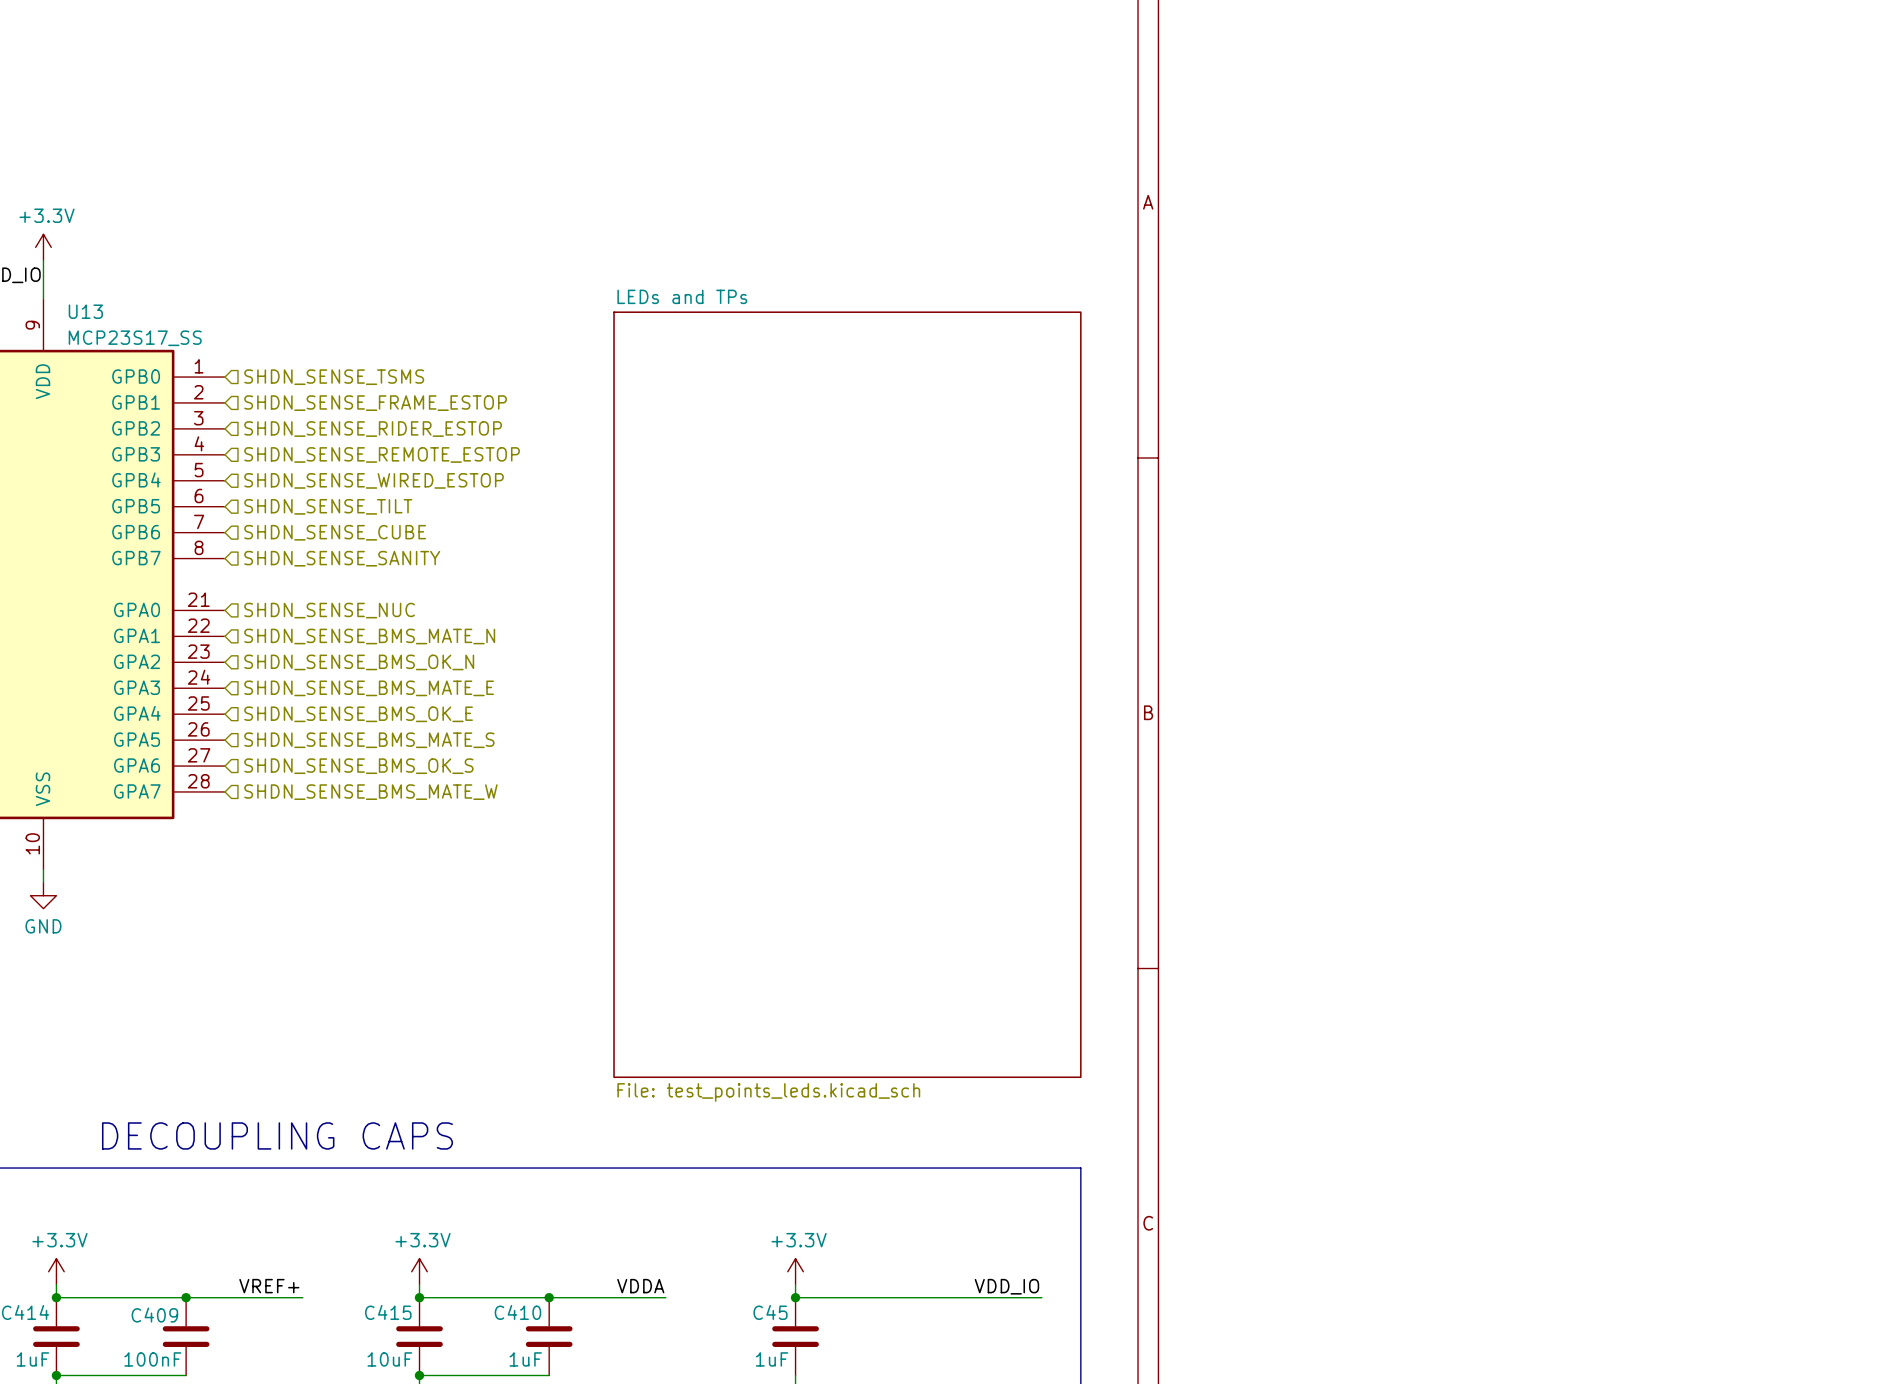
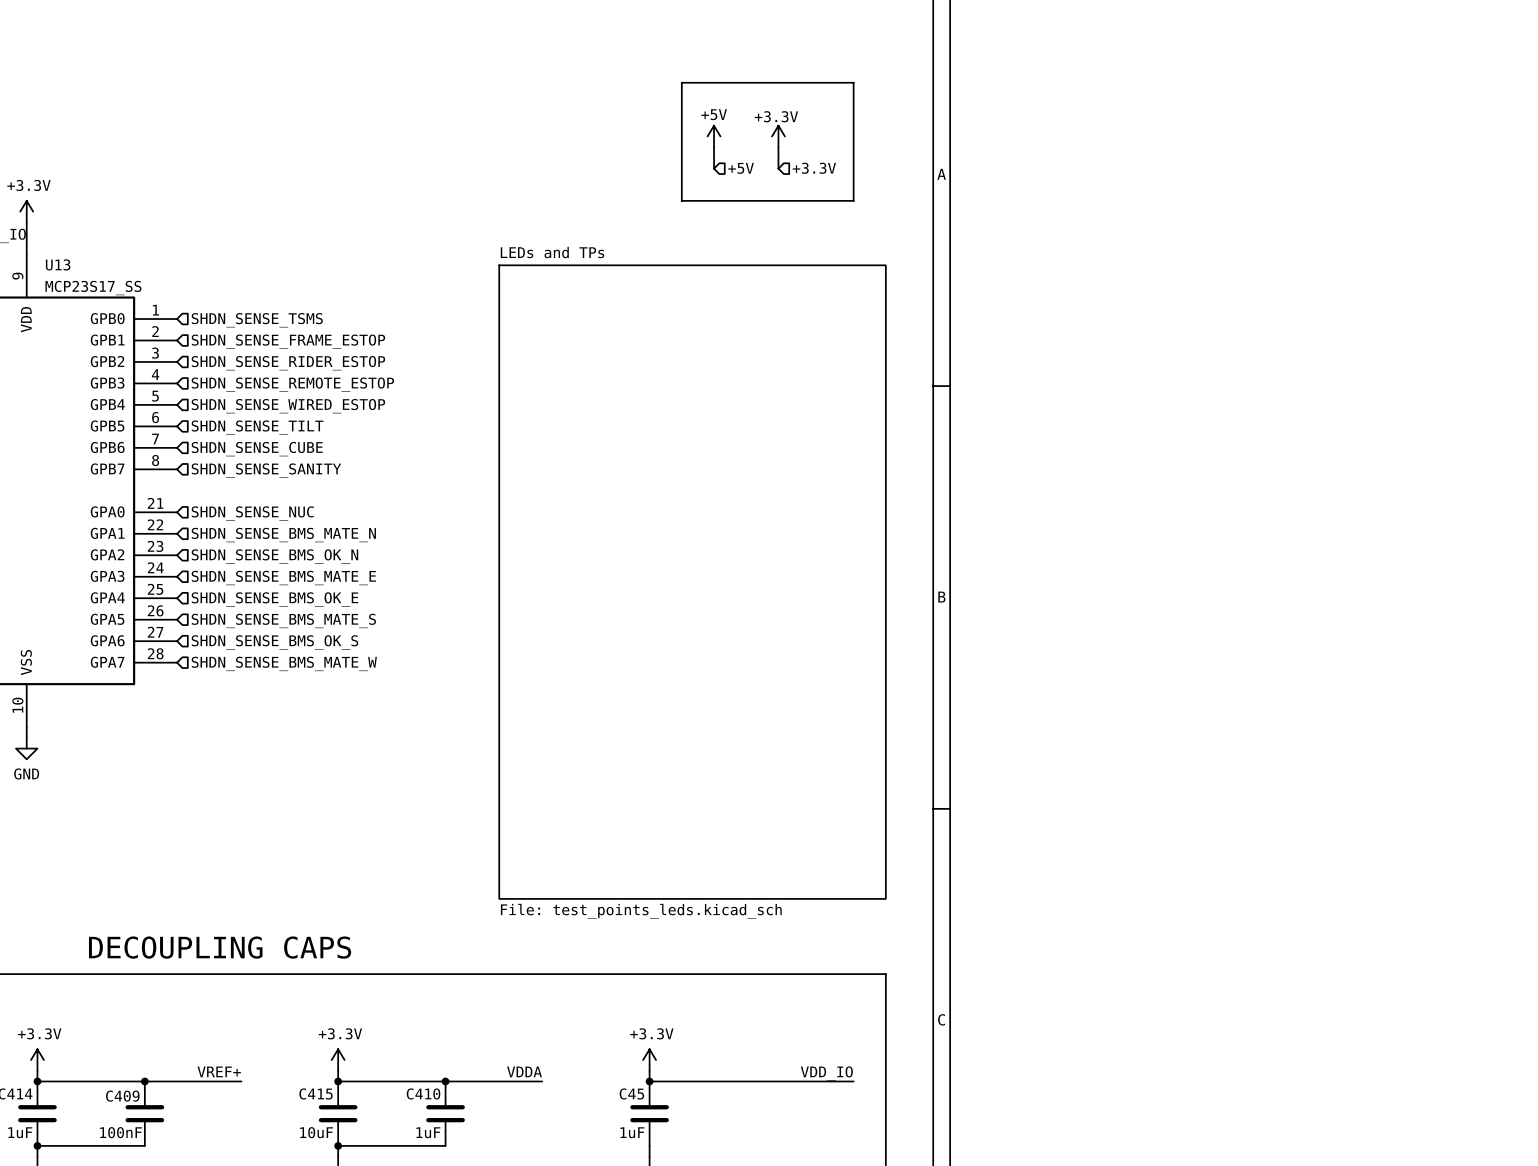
line: none -> (681, 82) (853, 82) (853, 200) (681, 200) (681, 82)
power symbol: none -> +5V (714, 136)
power symbol: none -> +3.3V (778, 136)
wire: none -> (714, 147) (714, 168)
wire: none -> (778, 147) (778, 168)
hierarchical label: none -> +5V (741, 168)
hierarchical label: none -> +3.3V (814, 168)

